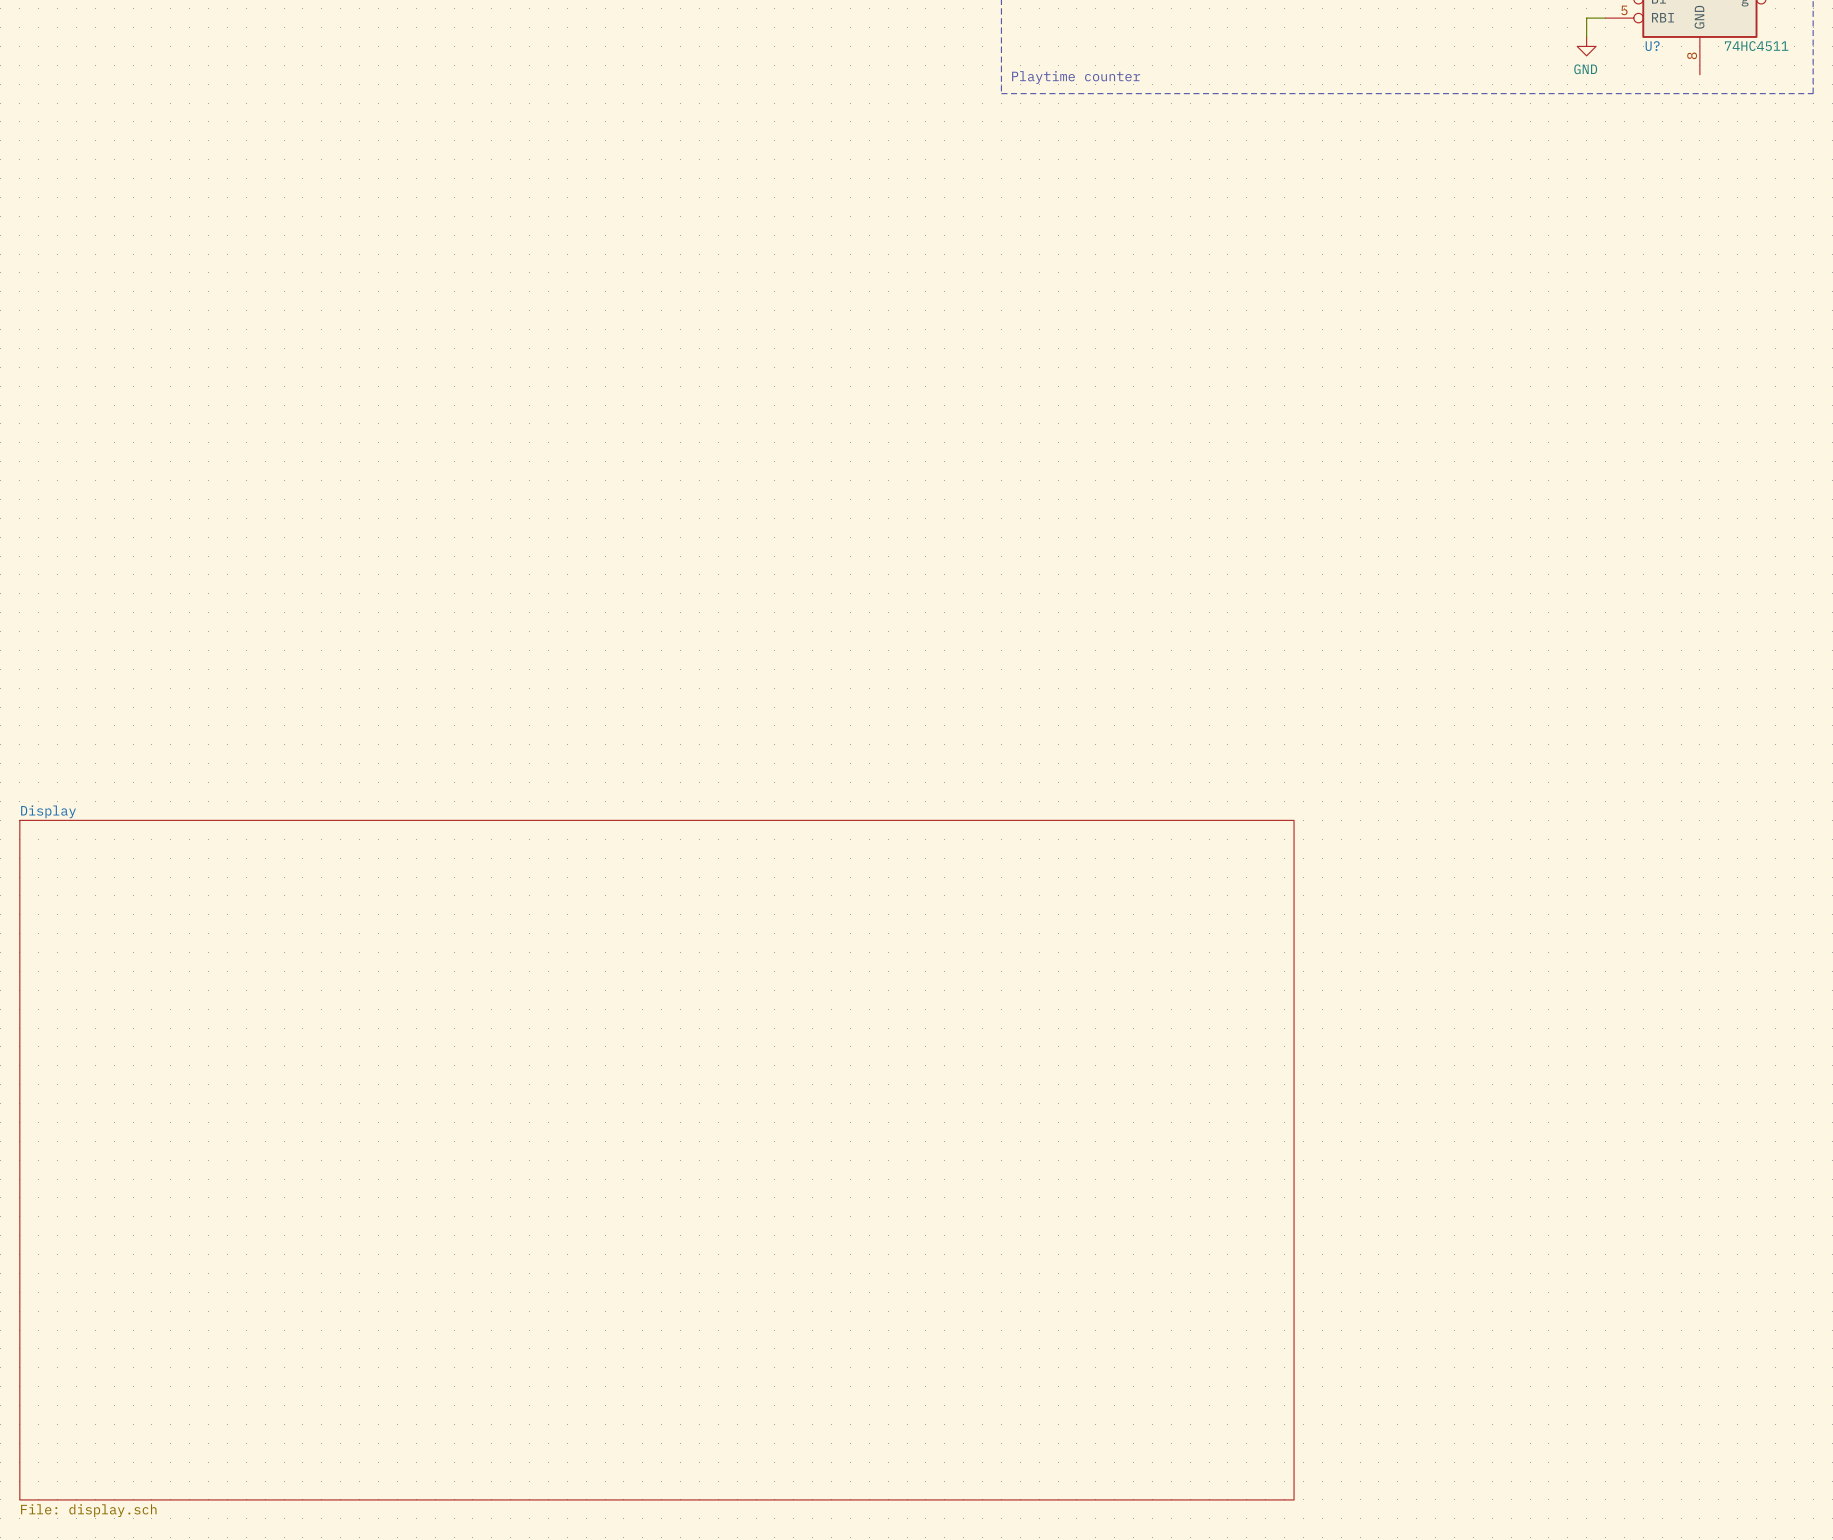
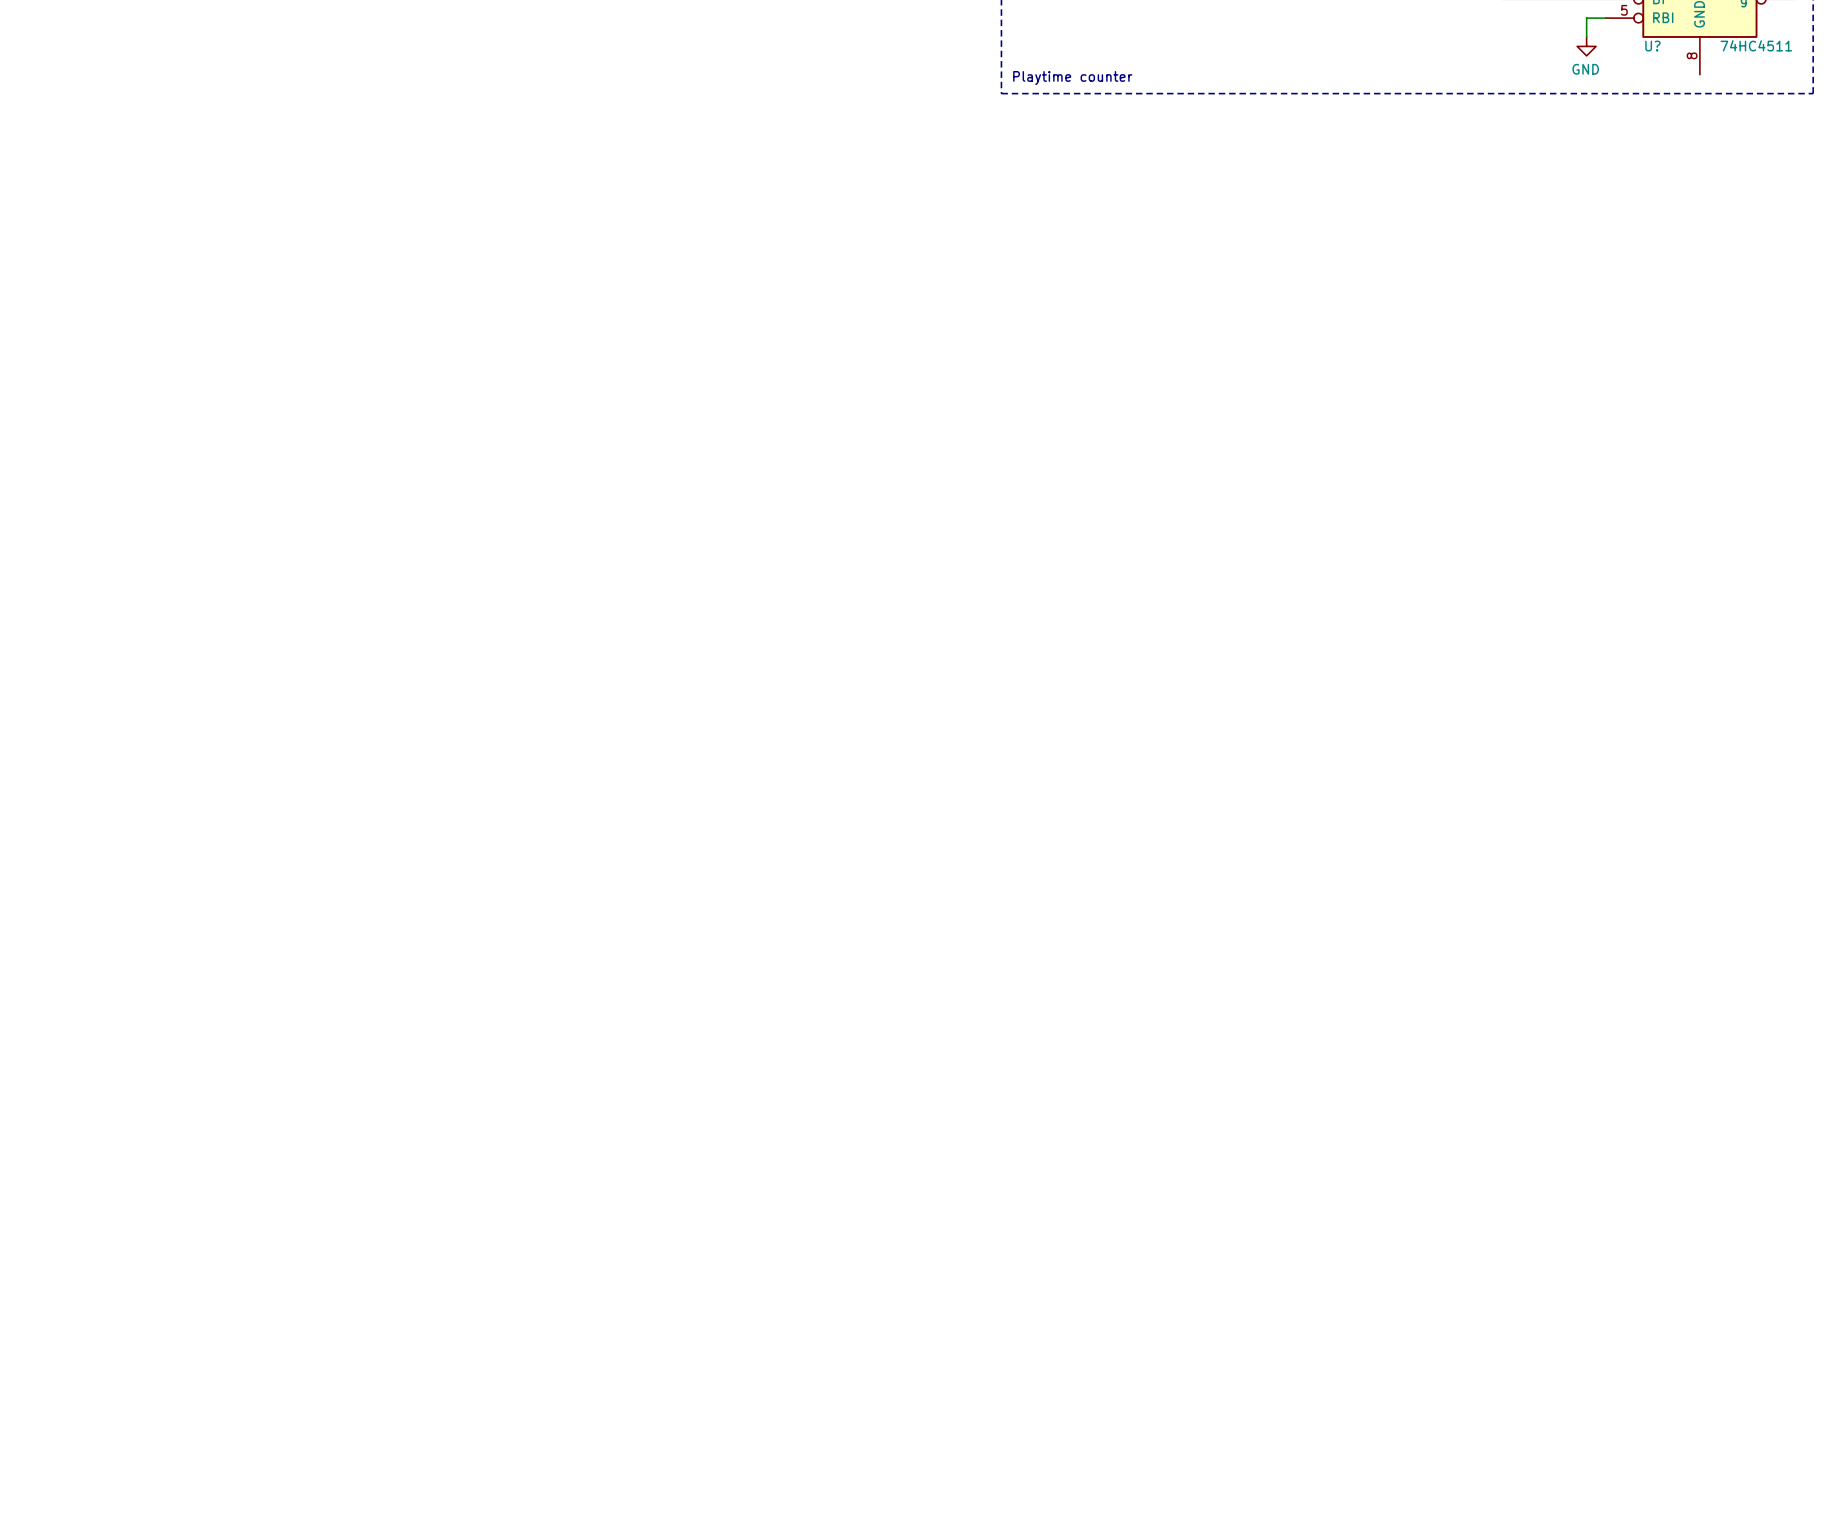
sheet Display: File: display.sch (656, 1160) -> none

